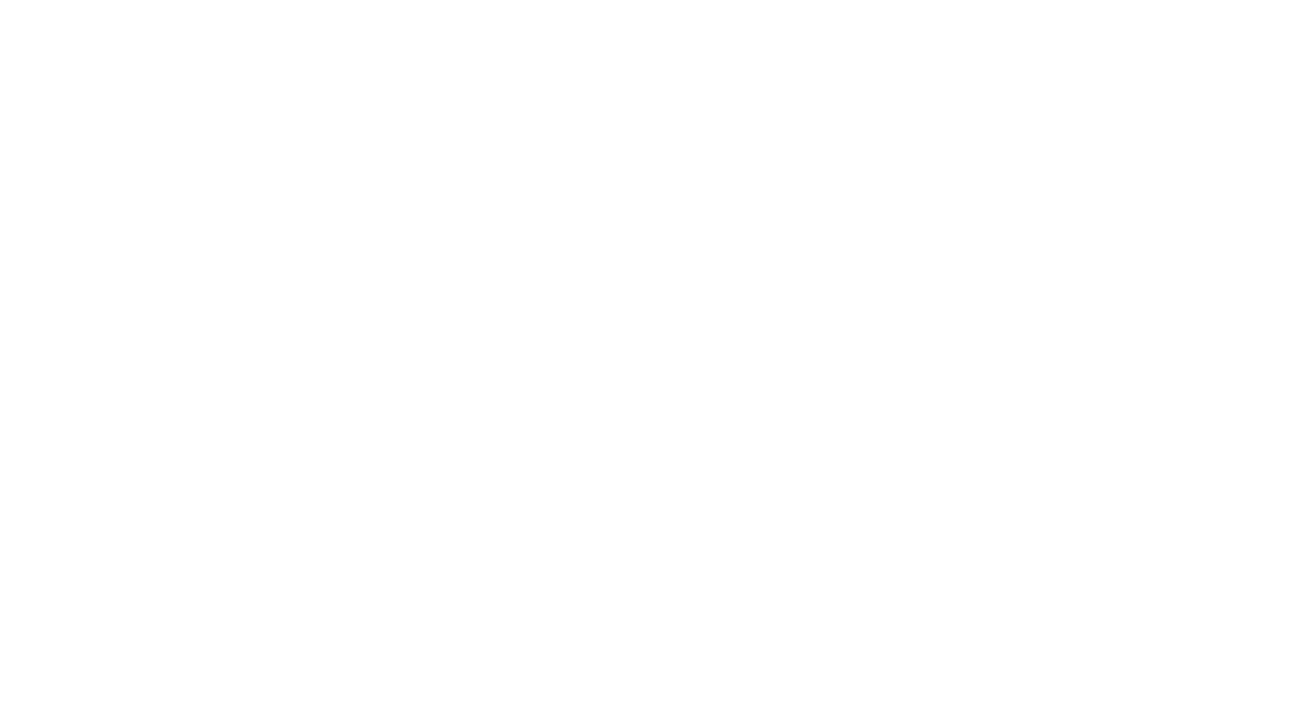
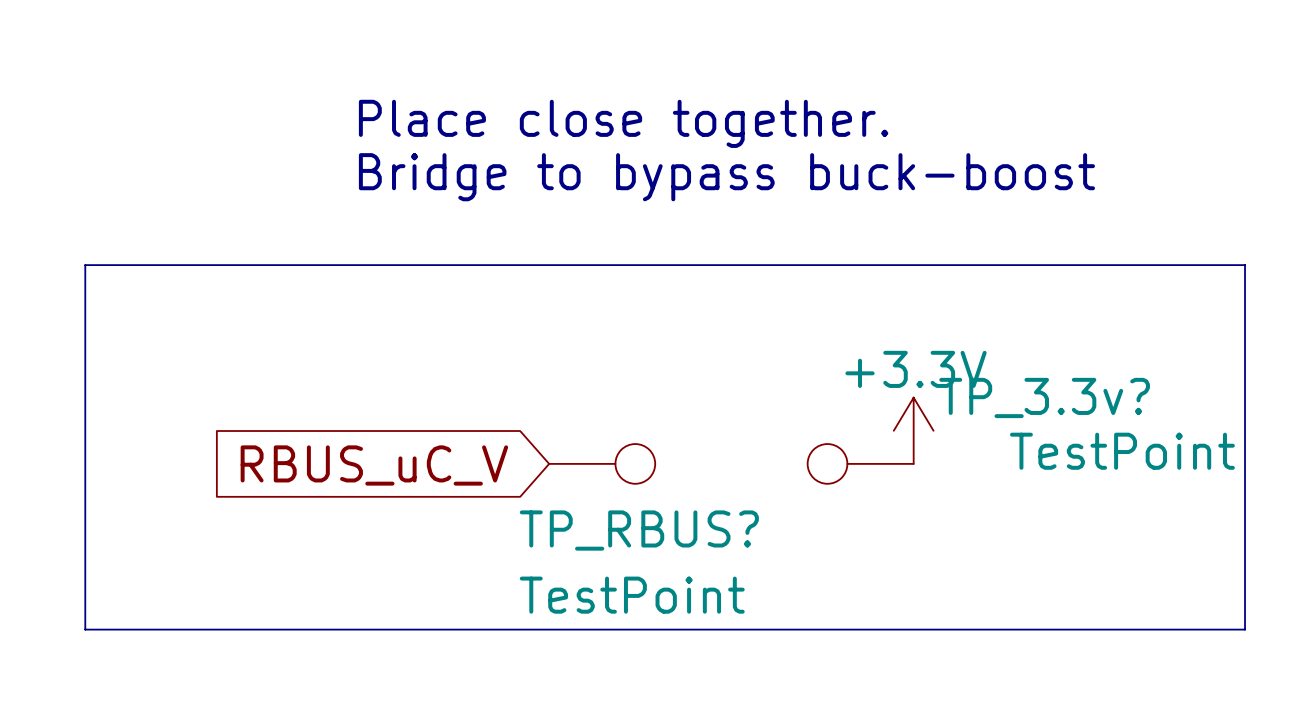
text: none -> Place close together. (623, 123)
text: none -> Bridge to bypass buck-boost (726, 177)
line: none -> (85, 265) (85, 629) (1245, 629) (1245, 265) (85, 265)
power symbol: none -> +3.3V (913, 430)
TP_RBUS?: none -> TestPoint (602, 463)
TP_3.3v?: none -> TestPoint (860, 463)
global label: none -> RBUS_uC_V (374, 465)

